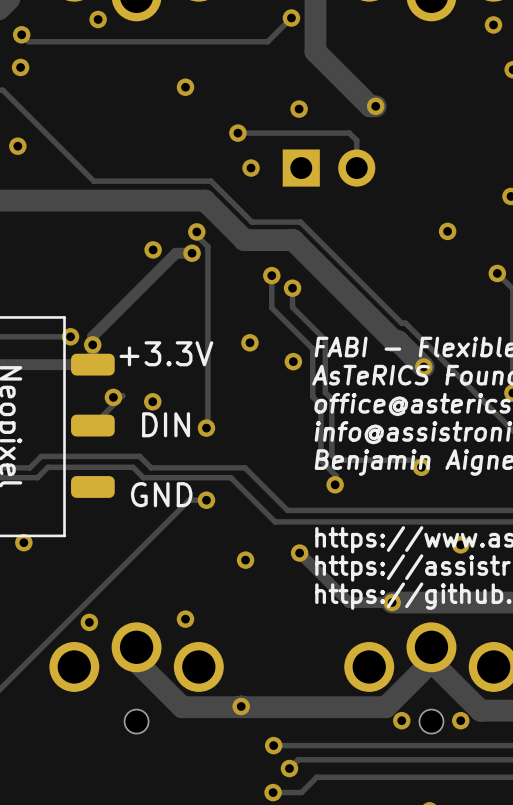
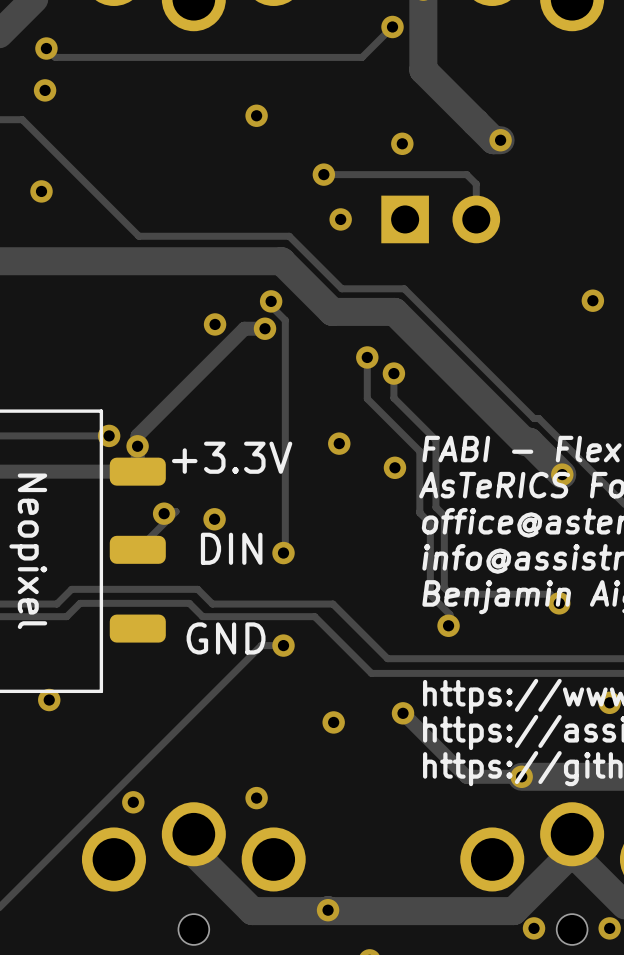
via: (98, 19) -> none

